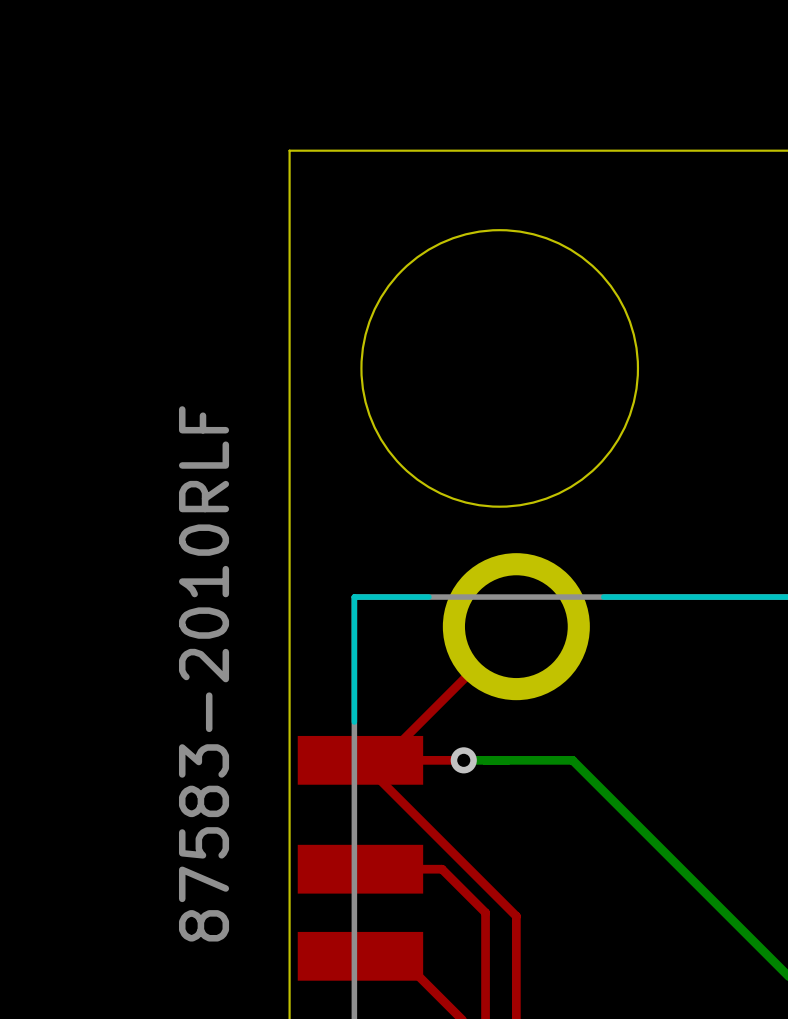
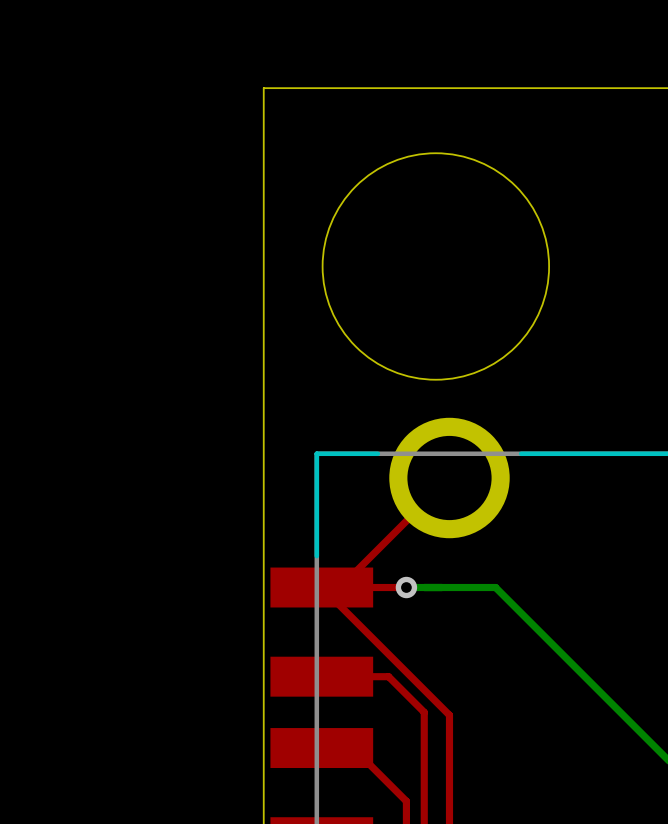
part value: 87583-2010RLF (204, 673) -> none

